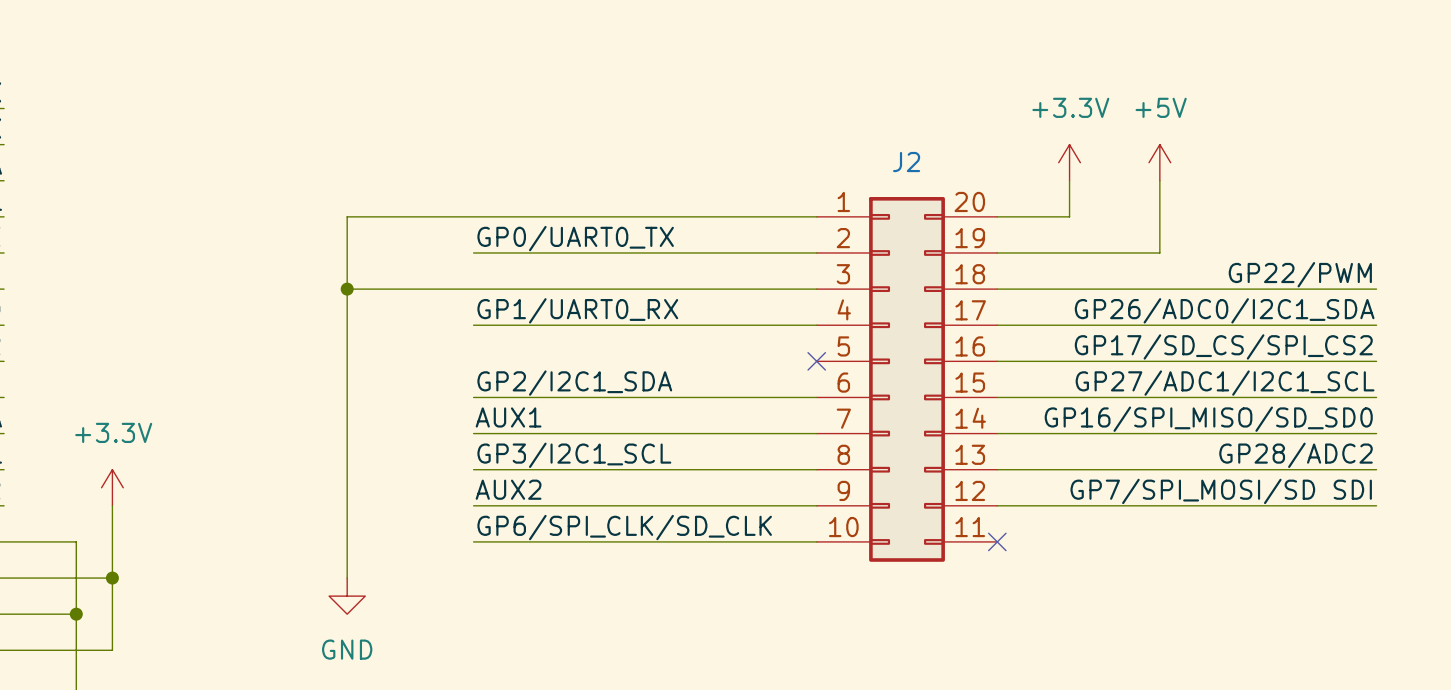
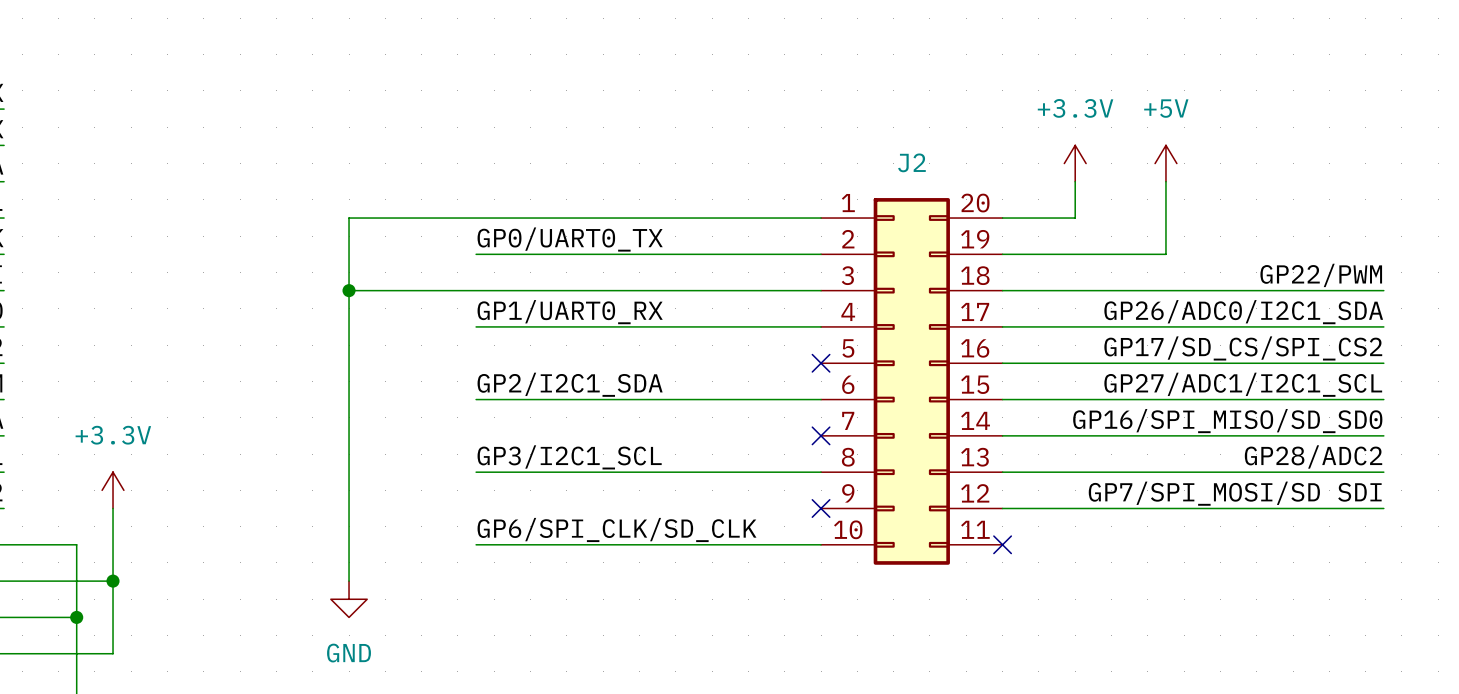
label: AUX1 (508, 417) -> none
wire: (473, 433) (816, 433) -> none
no-connect mark: none -> (821, 435)
label: AUX2 (508, 489) -> none
wire: (473, 505) (816, 505) -> none
no-connect mark: none -> (821, 508)

